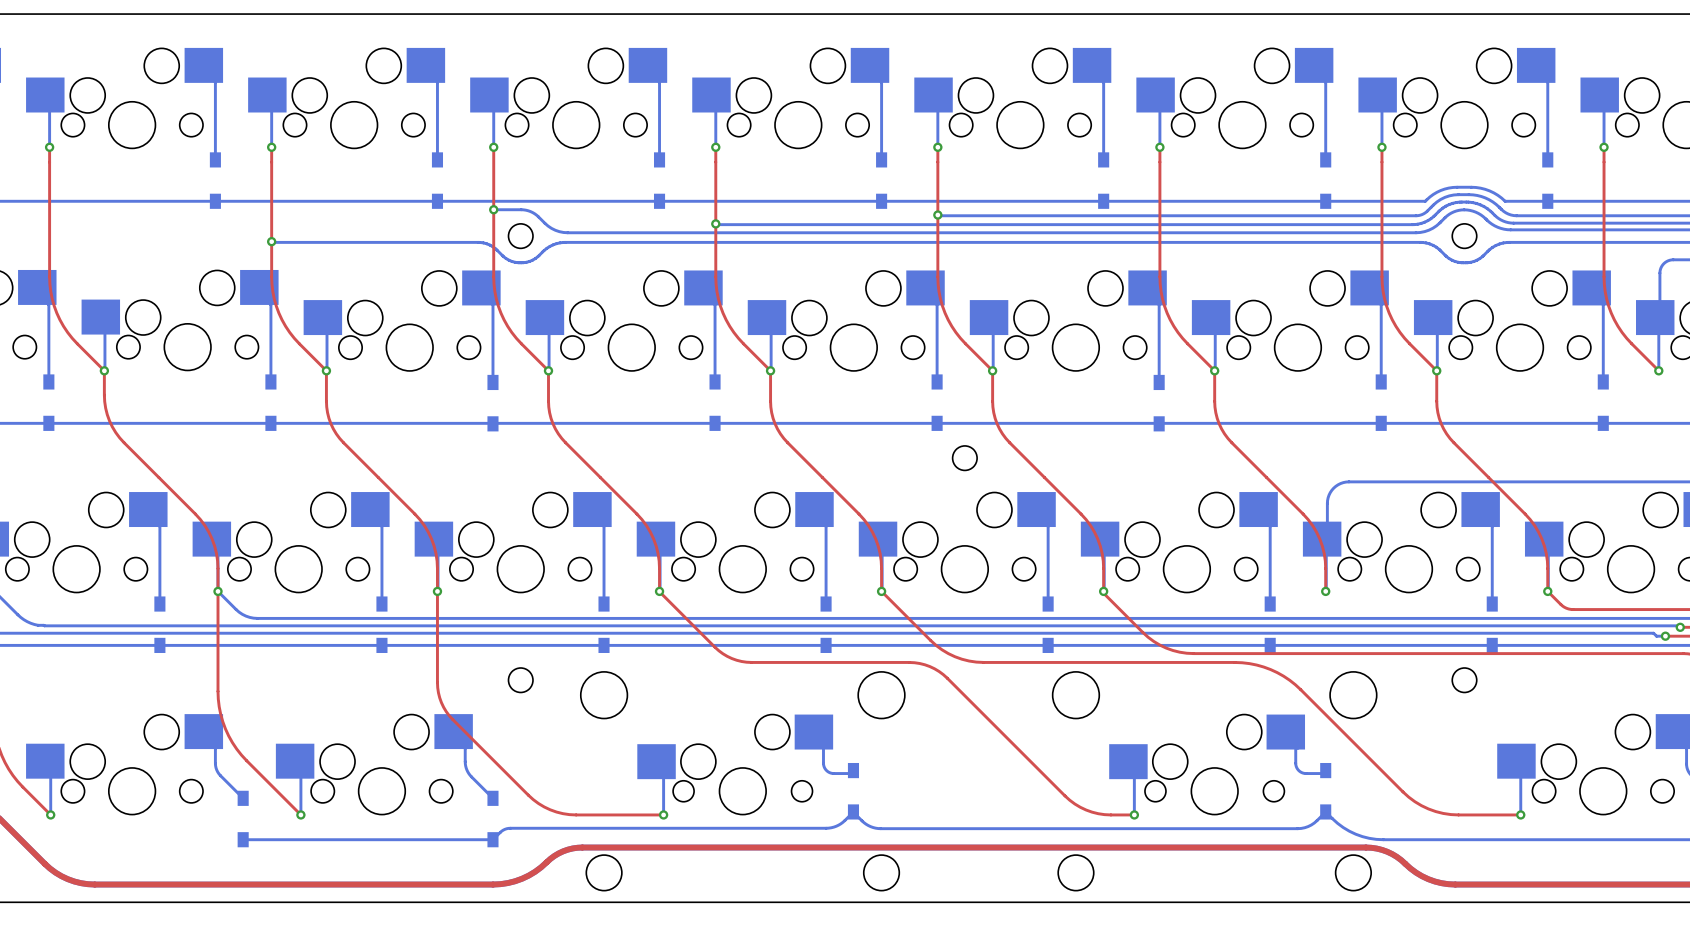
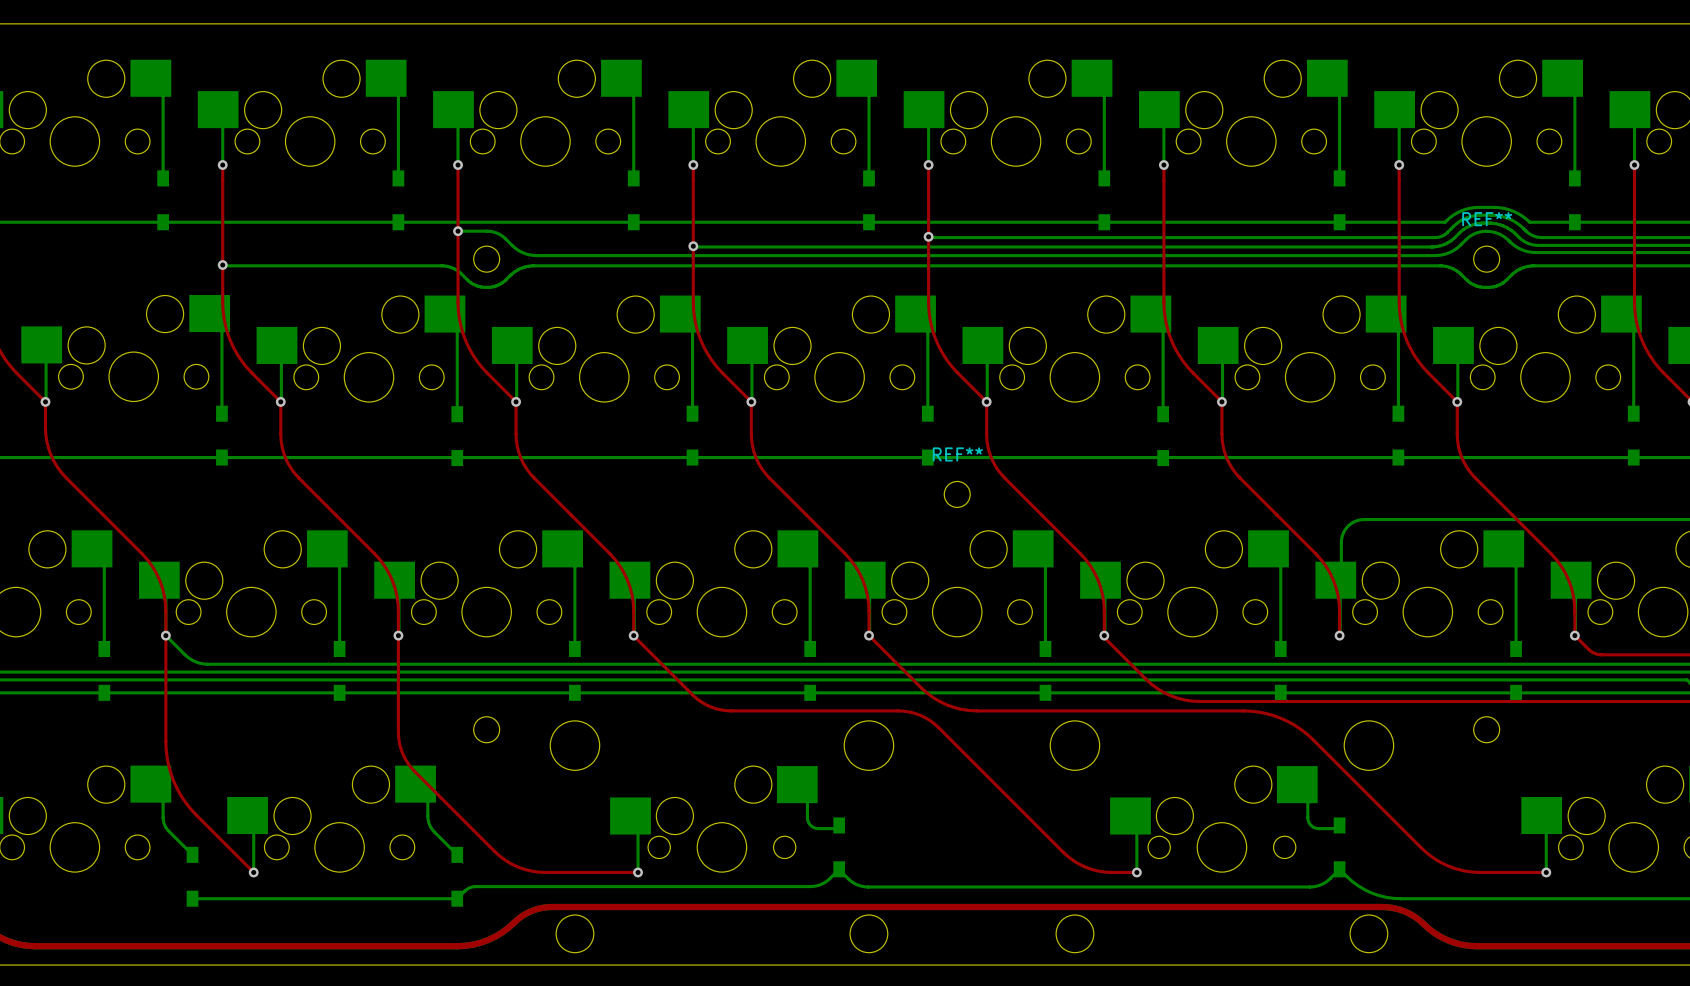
REF** name: none -> REF** (1487, 219)
REF** name: none -> REF** (957, 454)

